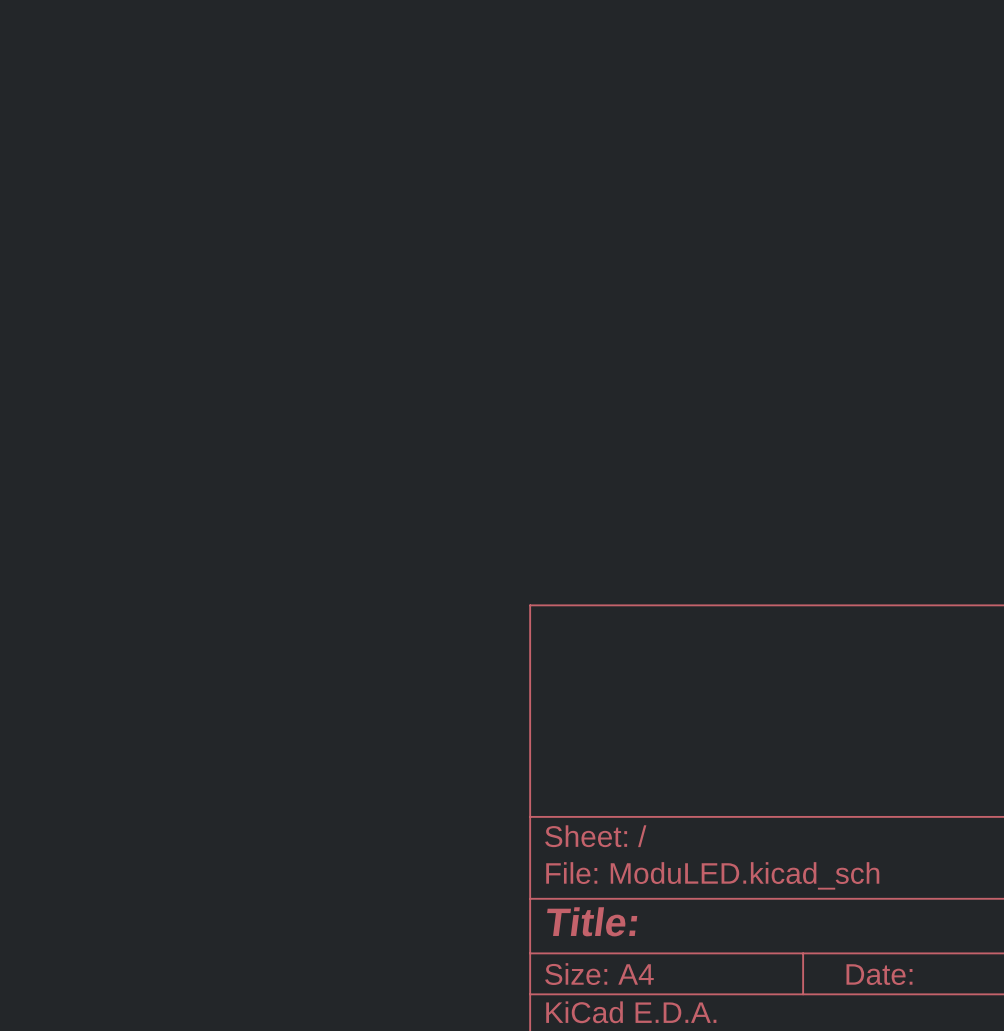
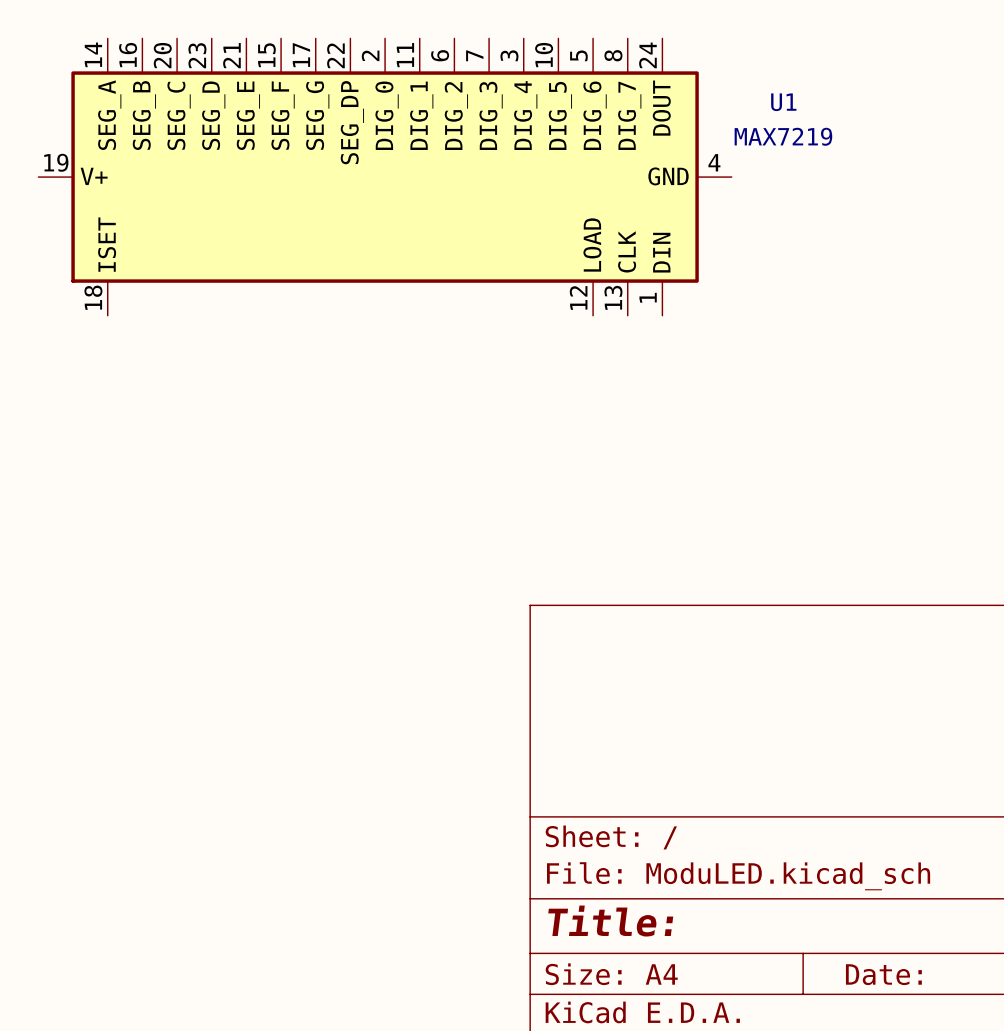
U1: none -> MAX7219 (385, 177)

